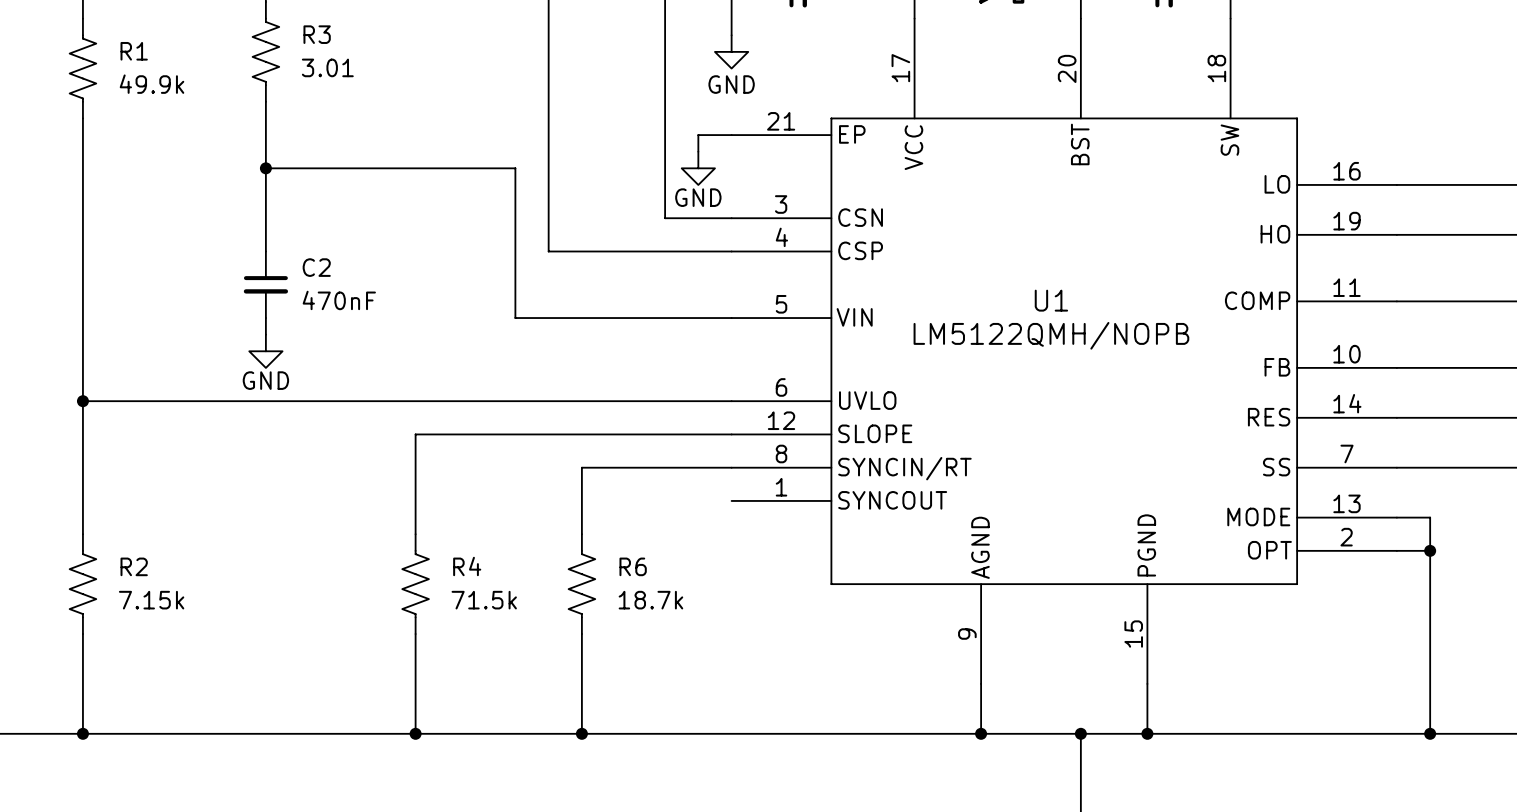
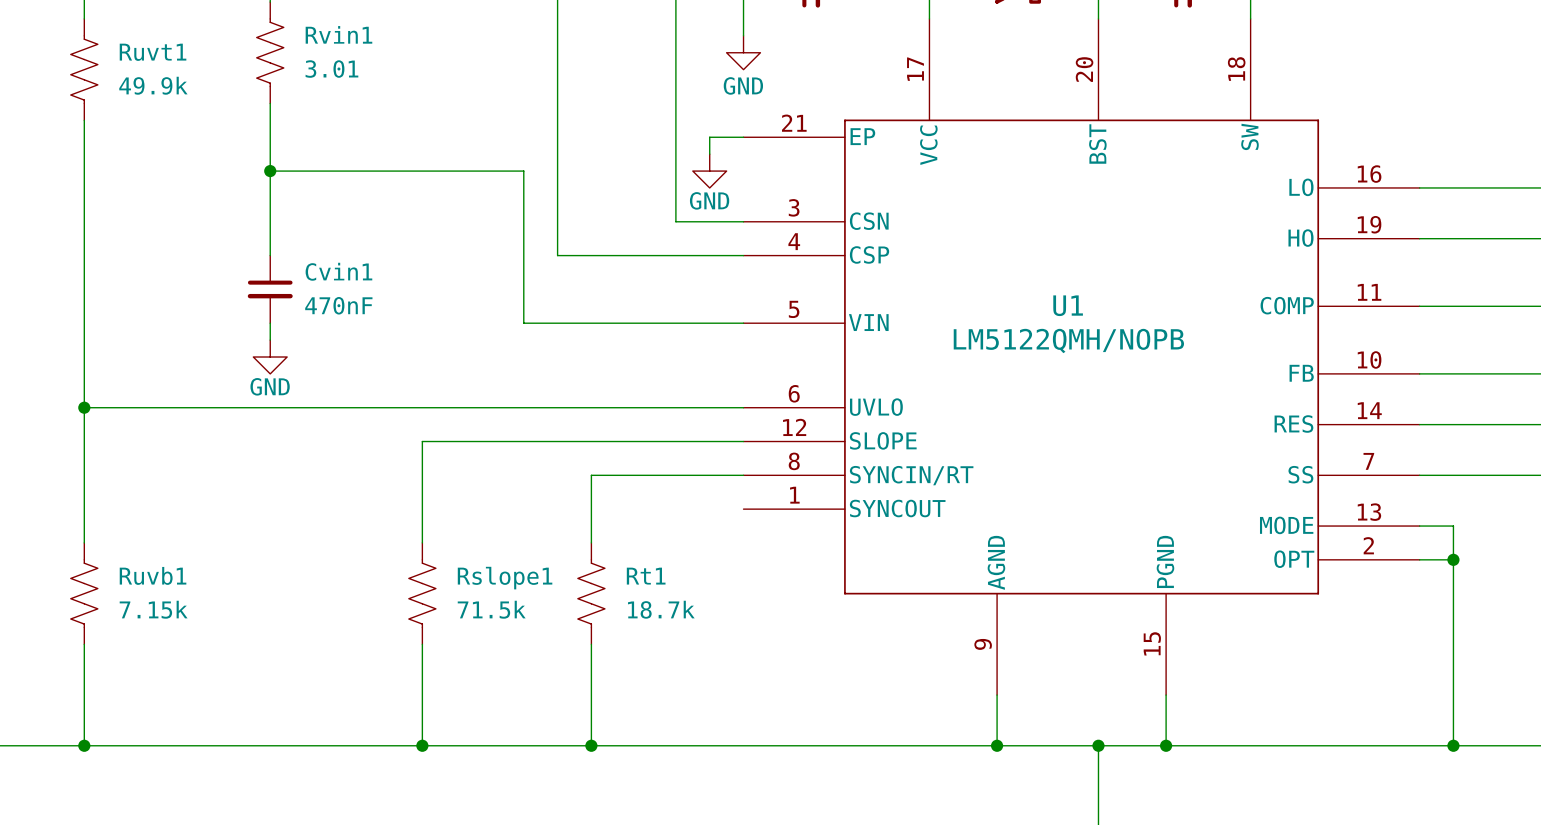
R3 name: R3 (317, 34) -> Rvin1 (338, 34)
R1 name: R1 (134, 51) -> Ruvt1 (153, 52)
C2 name: C2 (316, 267) -> Cvin1 (338, 271)
R2 name: R2 (134, 566) -> Ruvb1 (153, 575)
R4 name: R4 (467, 566) -> Rslope1 (505, 578)
R6 name: R6 (633, 566) -> Rt1 (646, 576)

